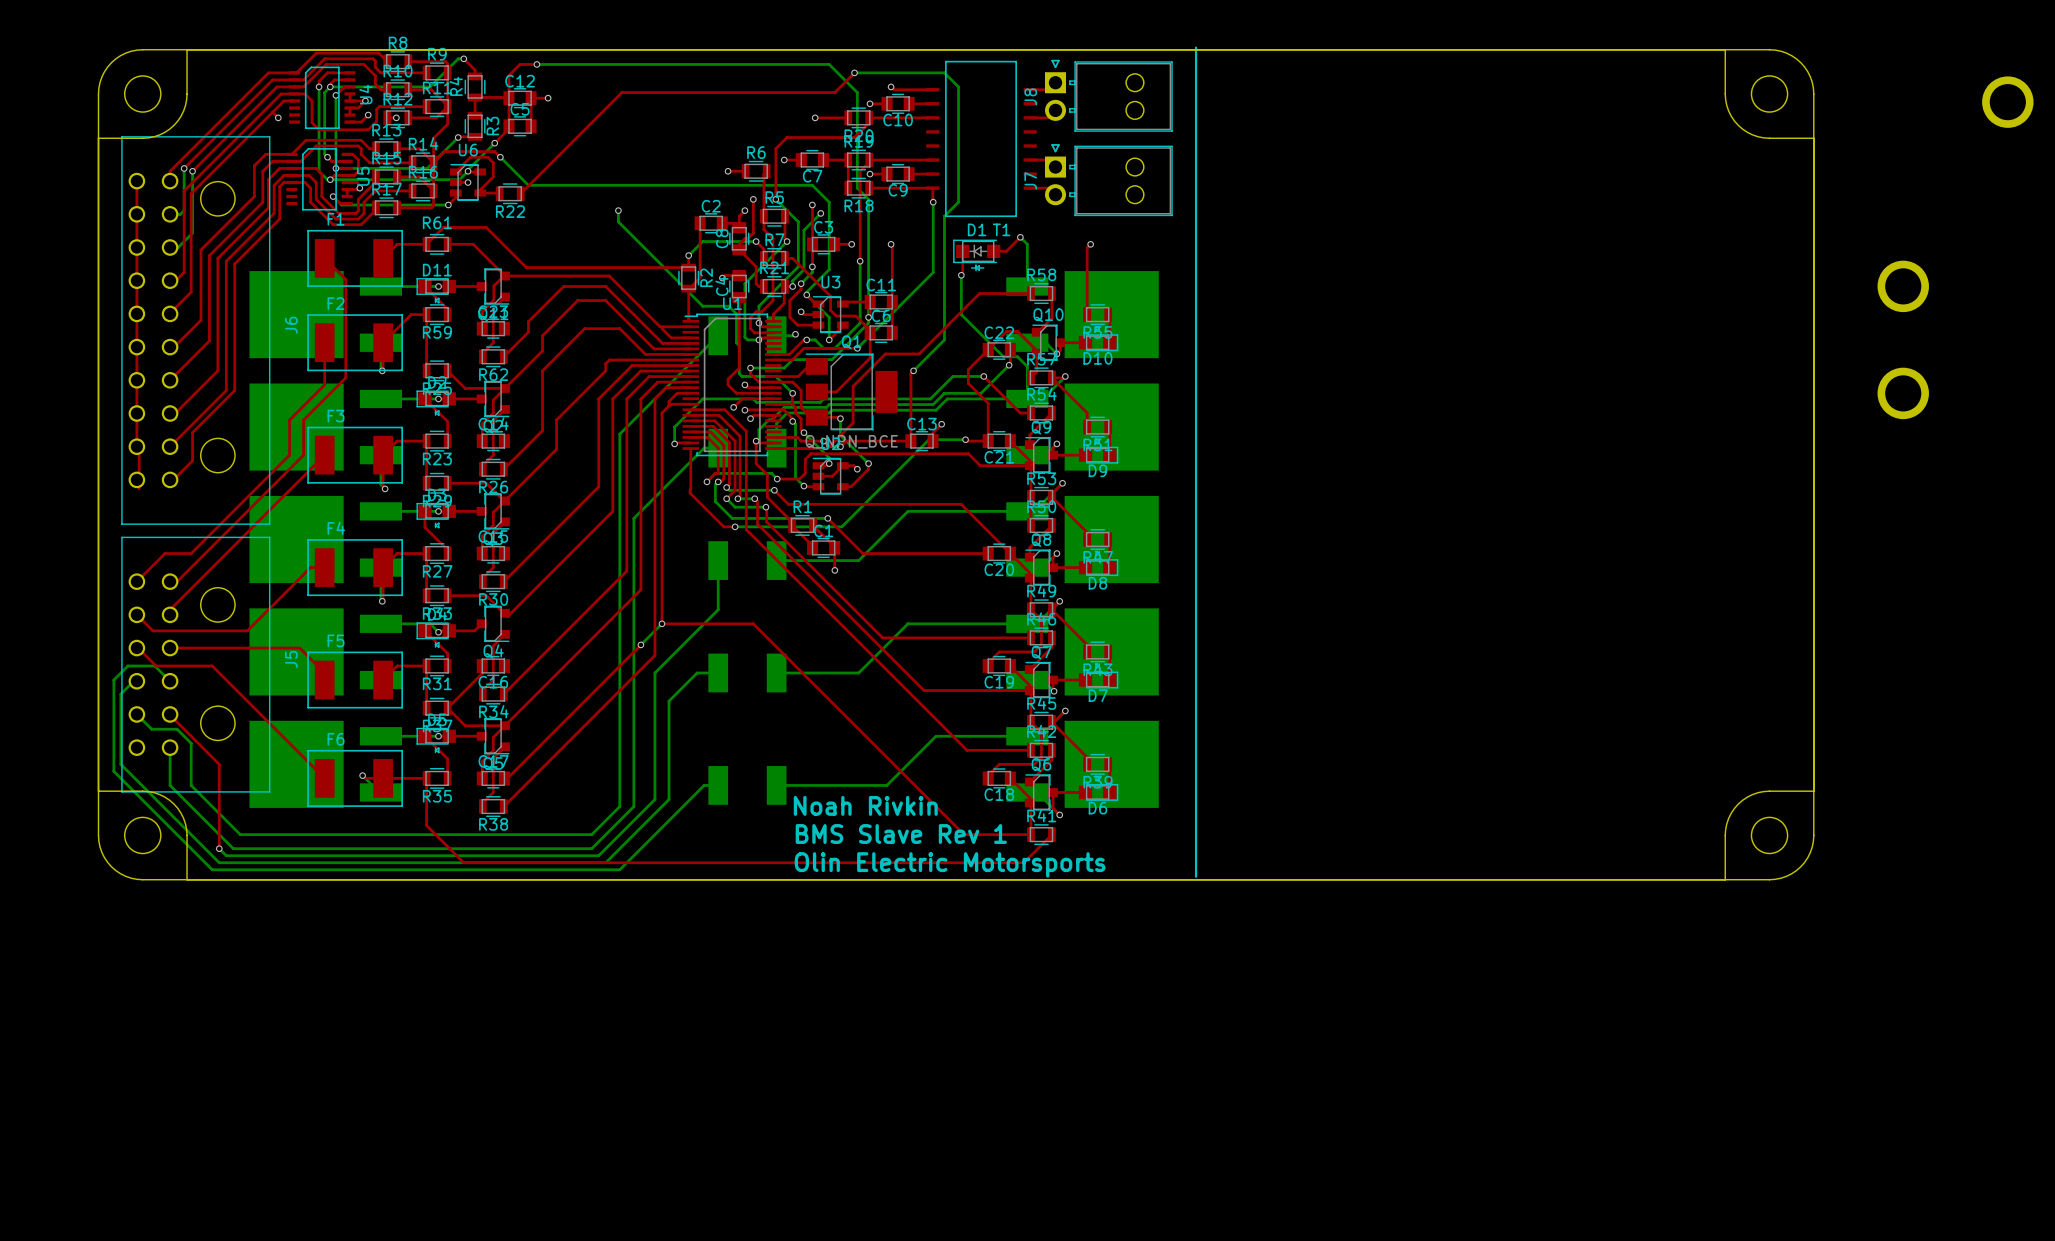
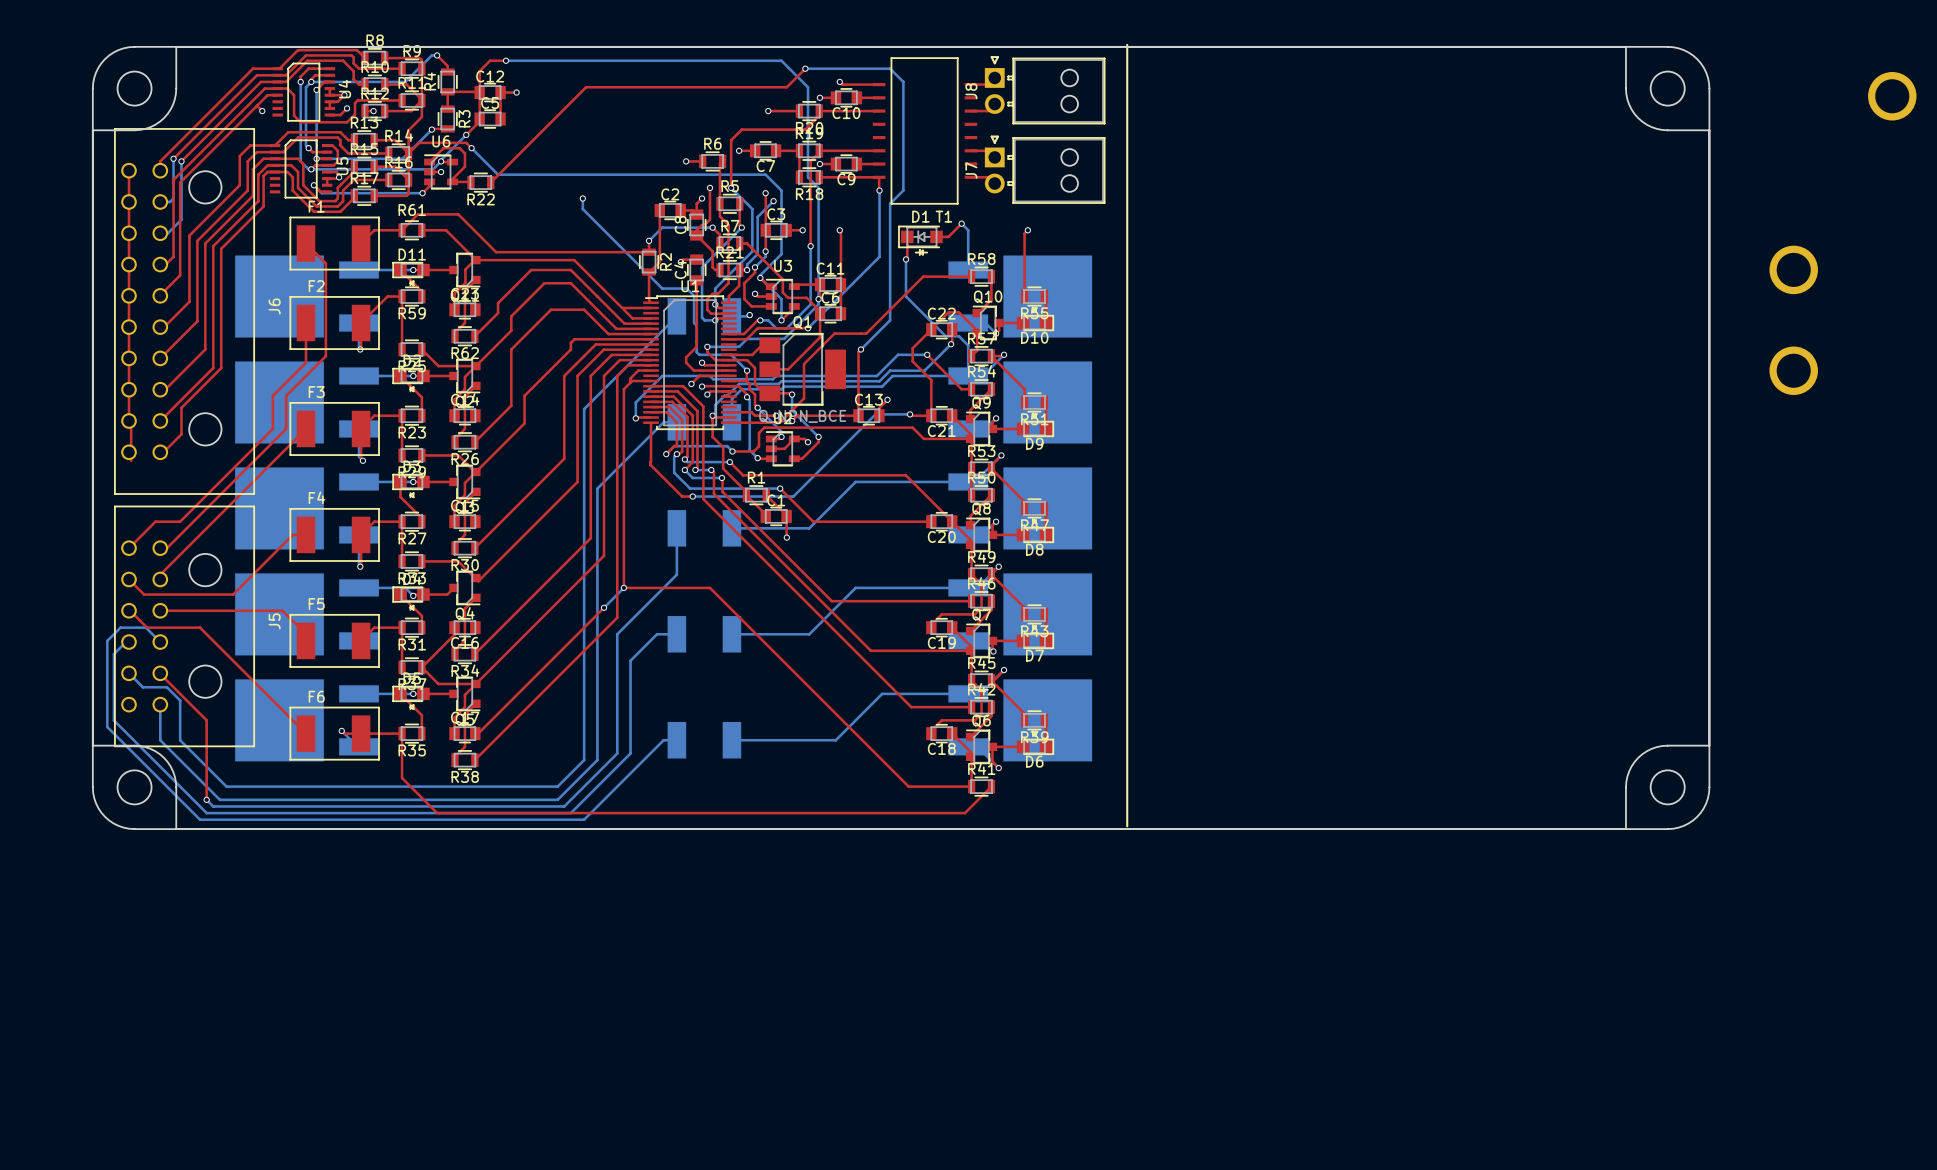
text: Noah Rivkin (865, 805) -> none
text: BMS Slave Rev 1 (901, 834) -> none
text: Olin Electric Motorsports (950, 864) -> none

